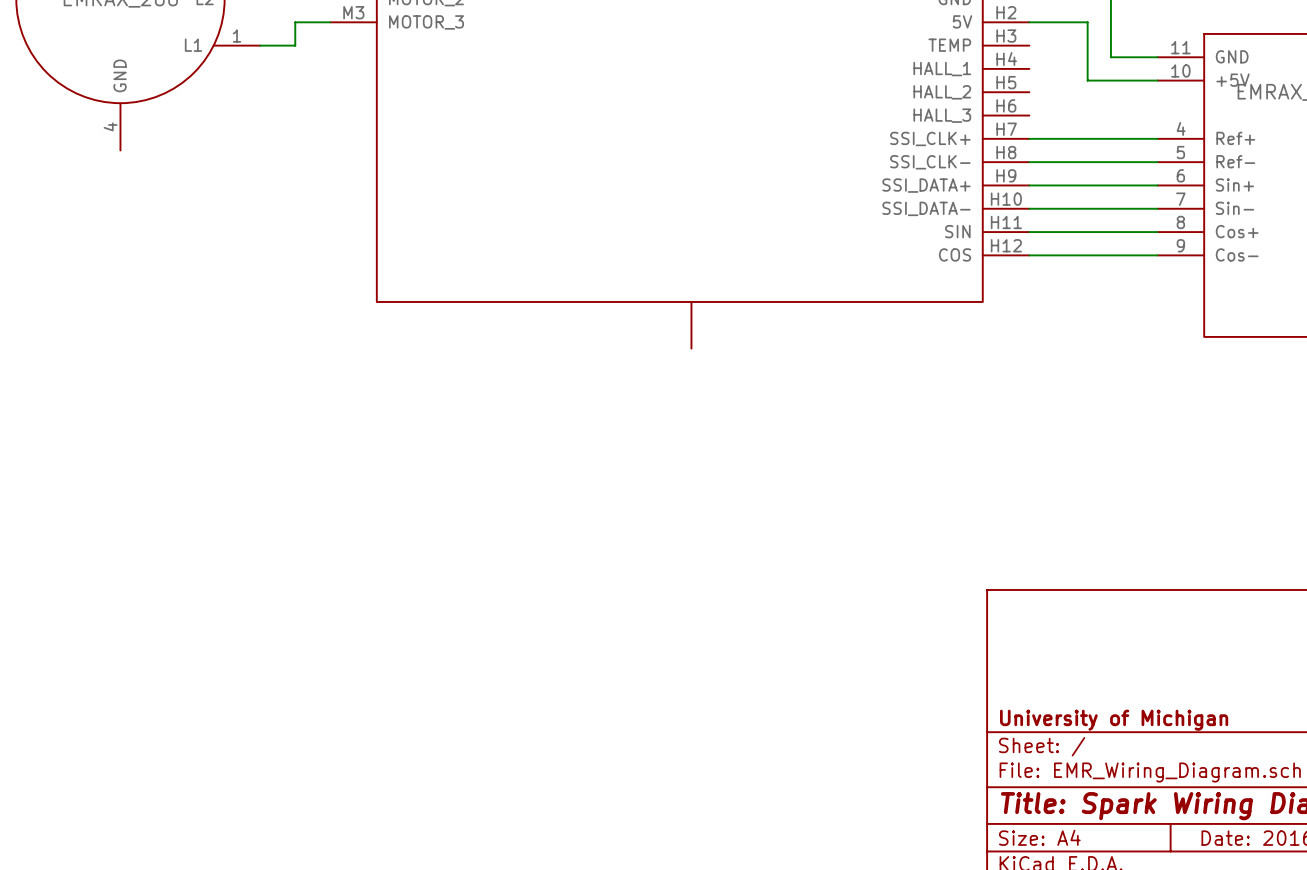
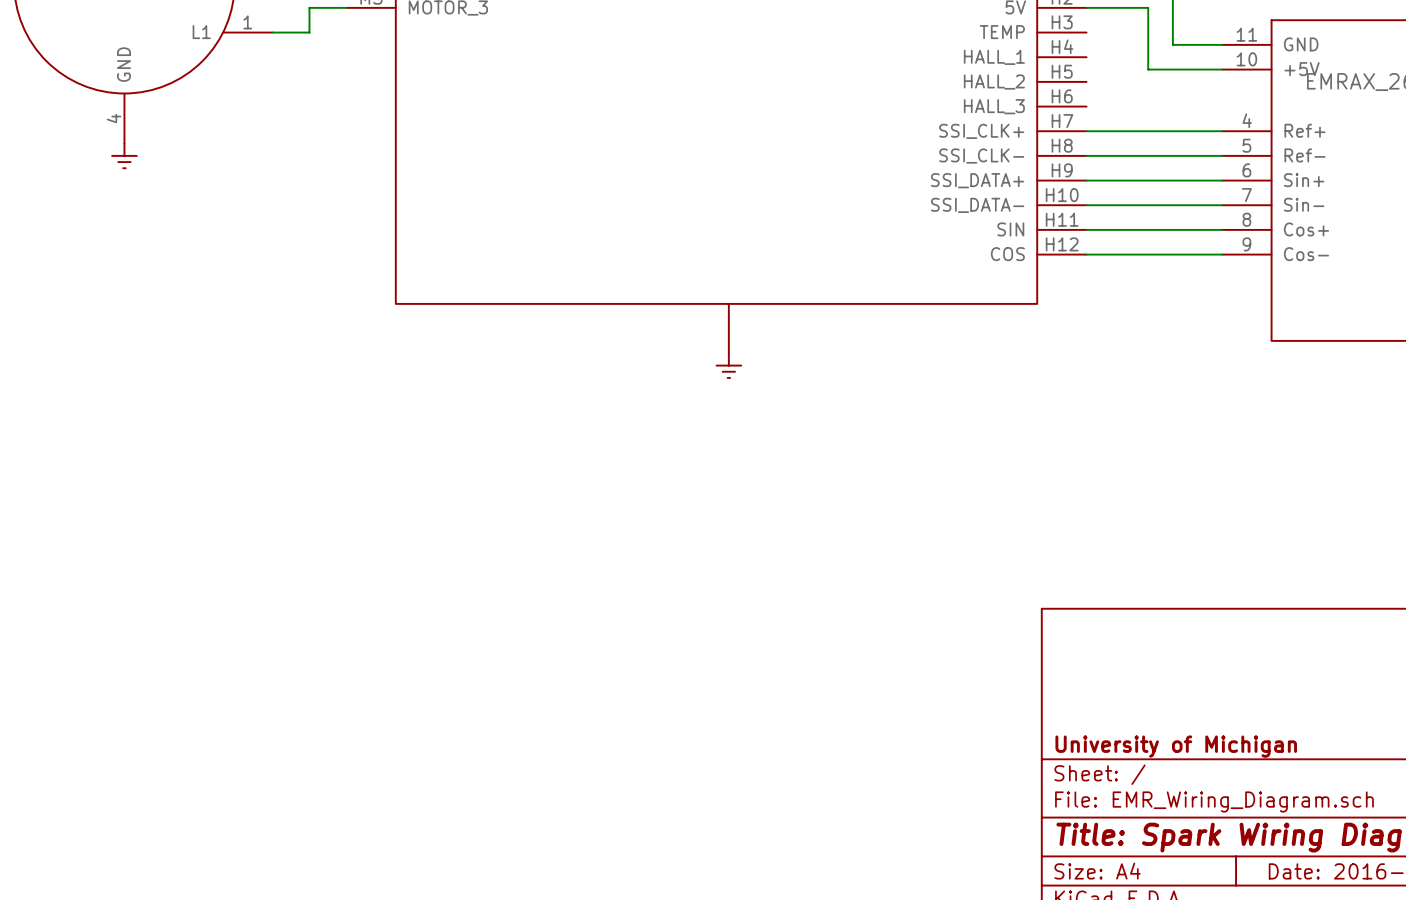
power symbol: none -> (124, 155)
power symbol: none -> (728, 365)

